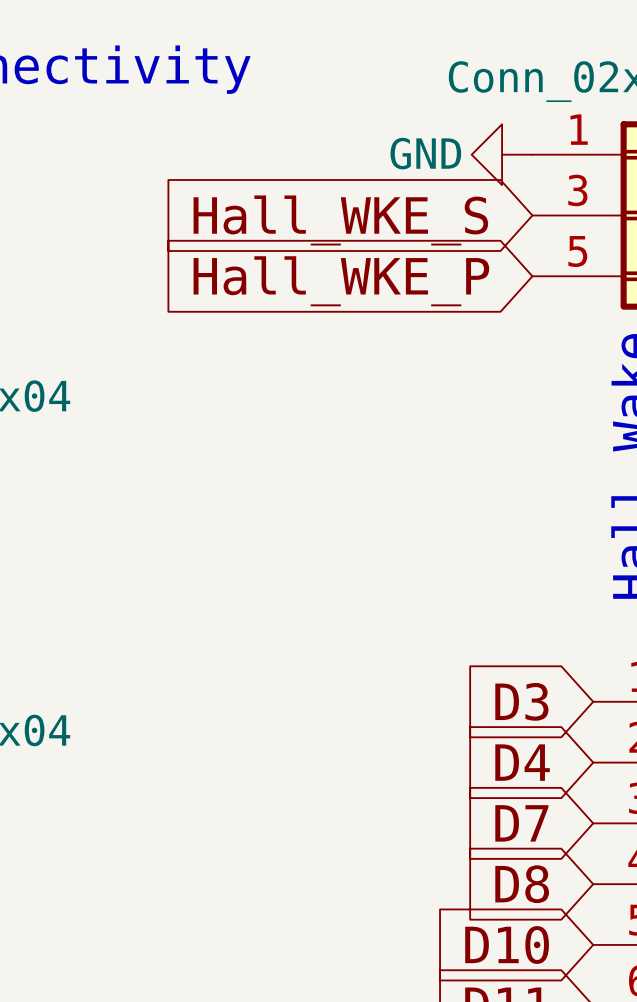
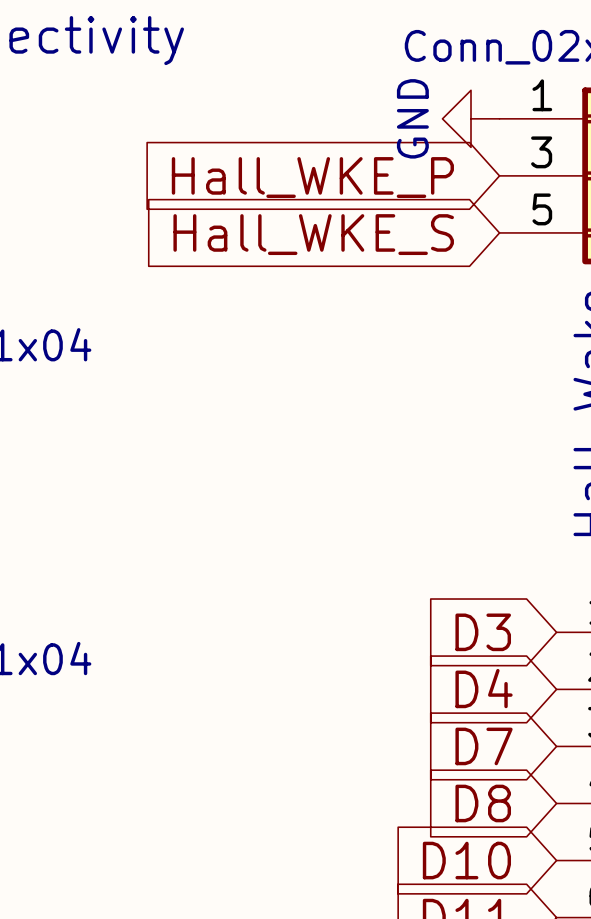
power symbol text rotation: 0° (425, 153) -> 90° counterclockwise (412, 118)
global label: Hall_WKE_S (340, 220) -> Hall_WKE_P (312, 177)
global label: Hall_WKE_P (341, 281) -> Hall_WKE_S (313, 234)

